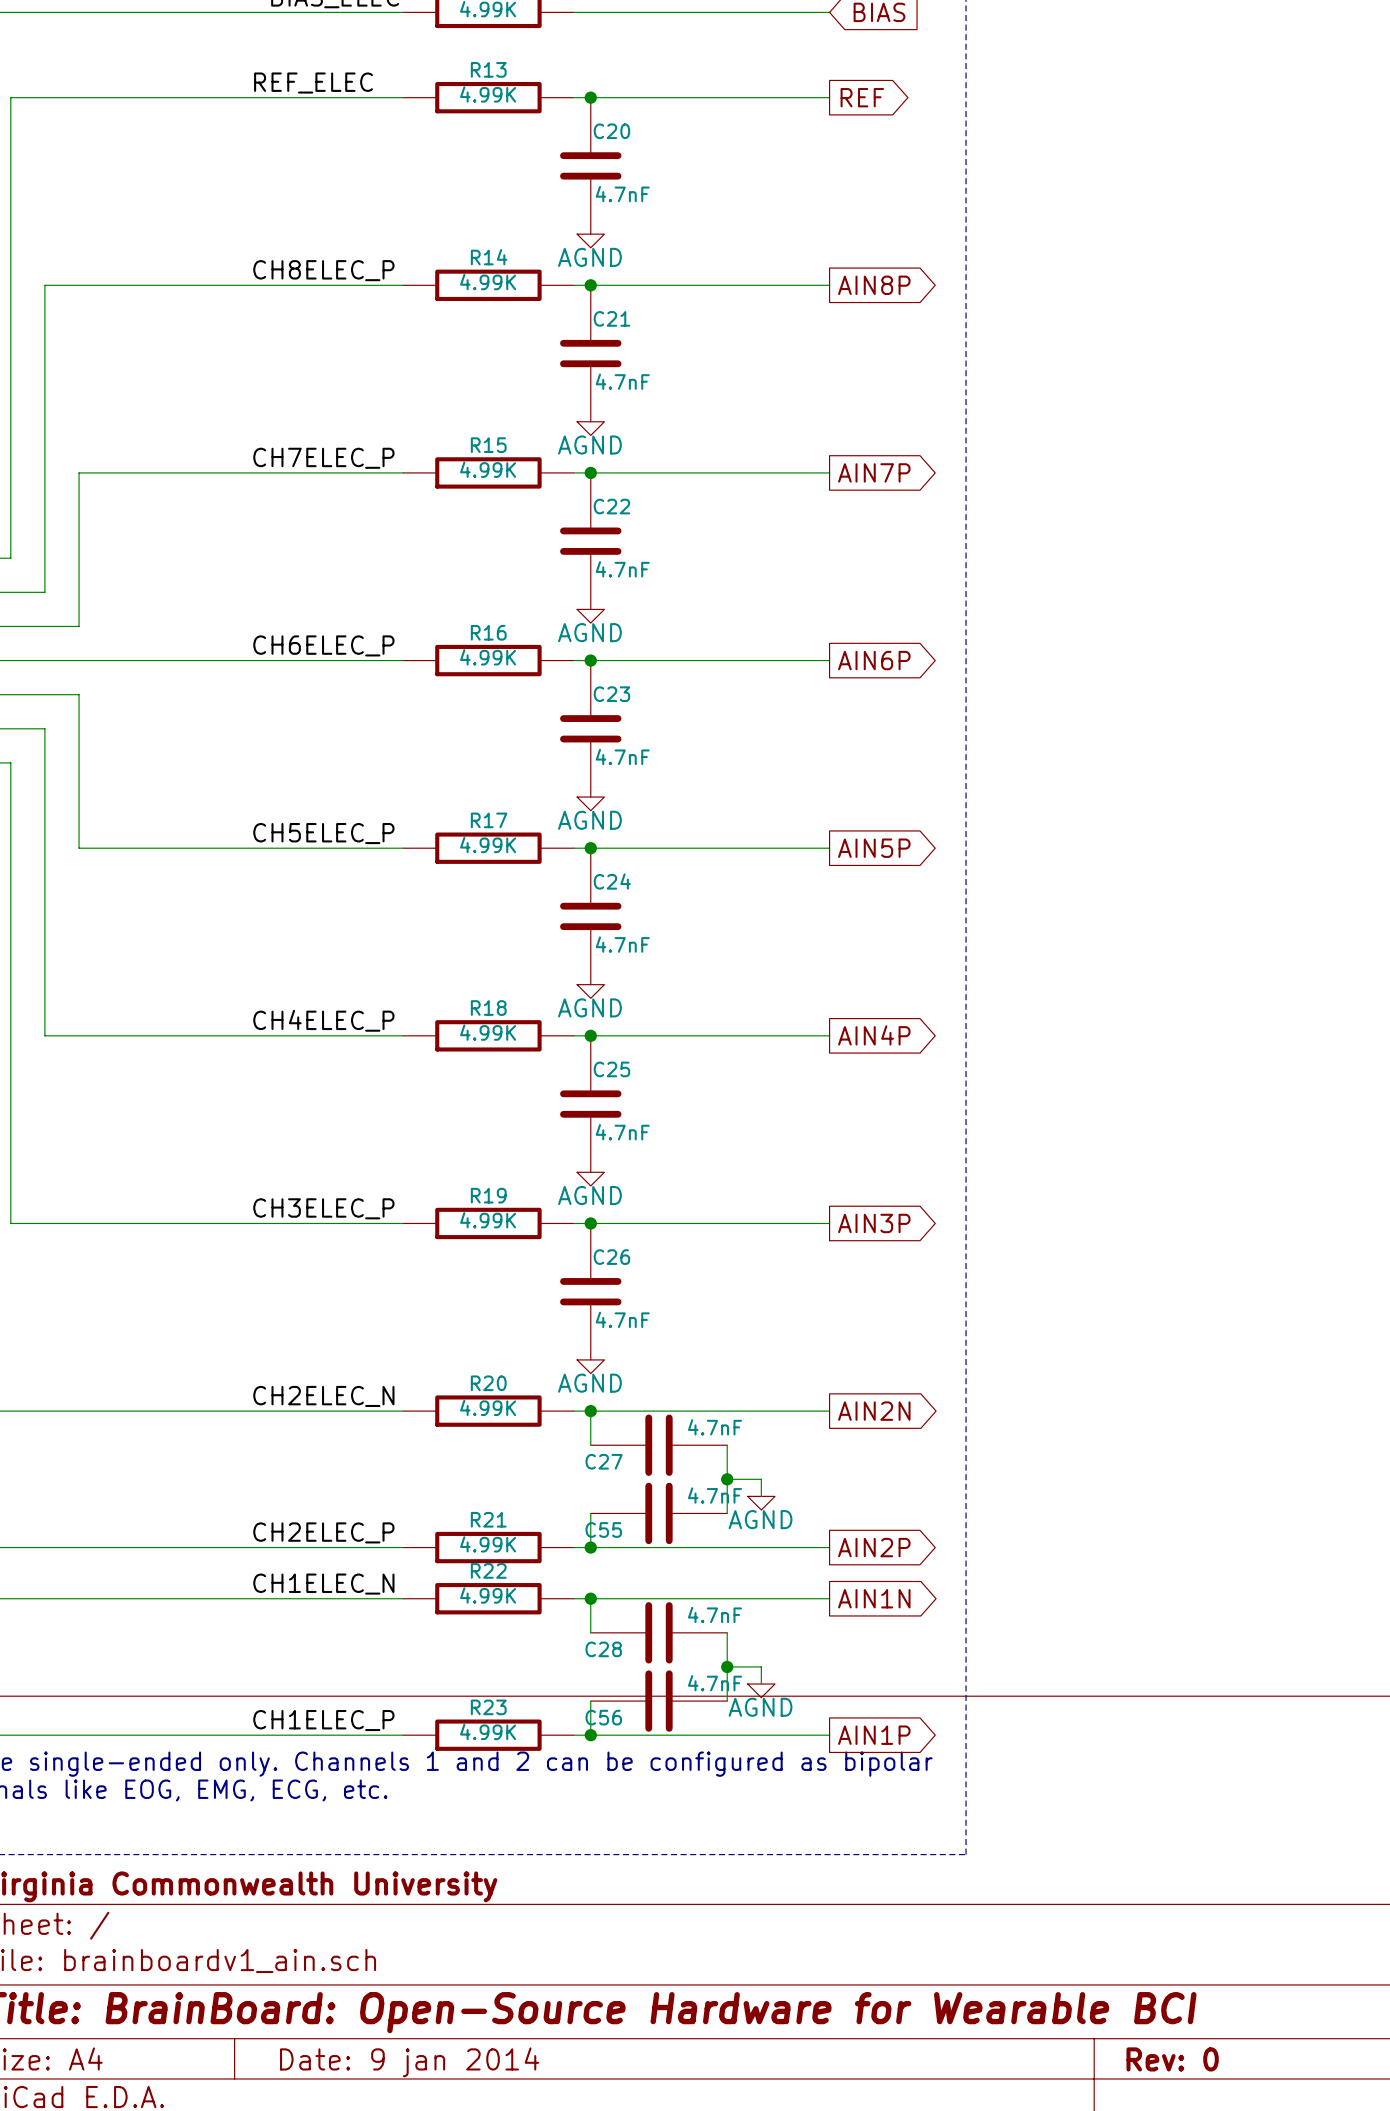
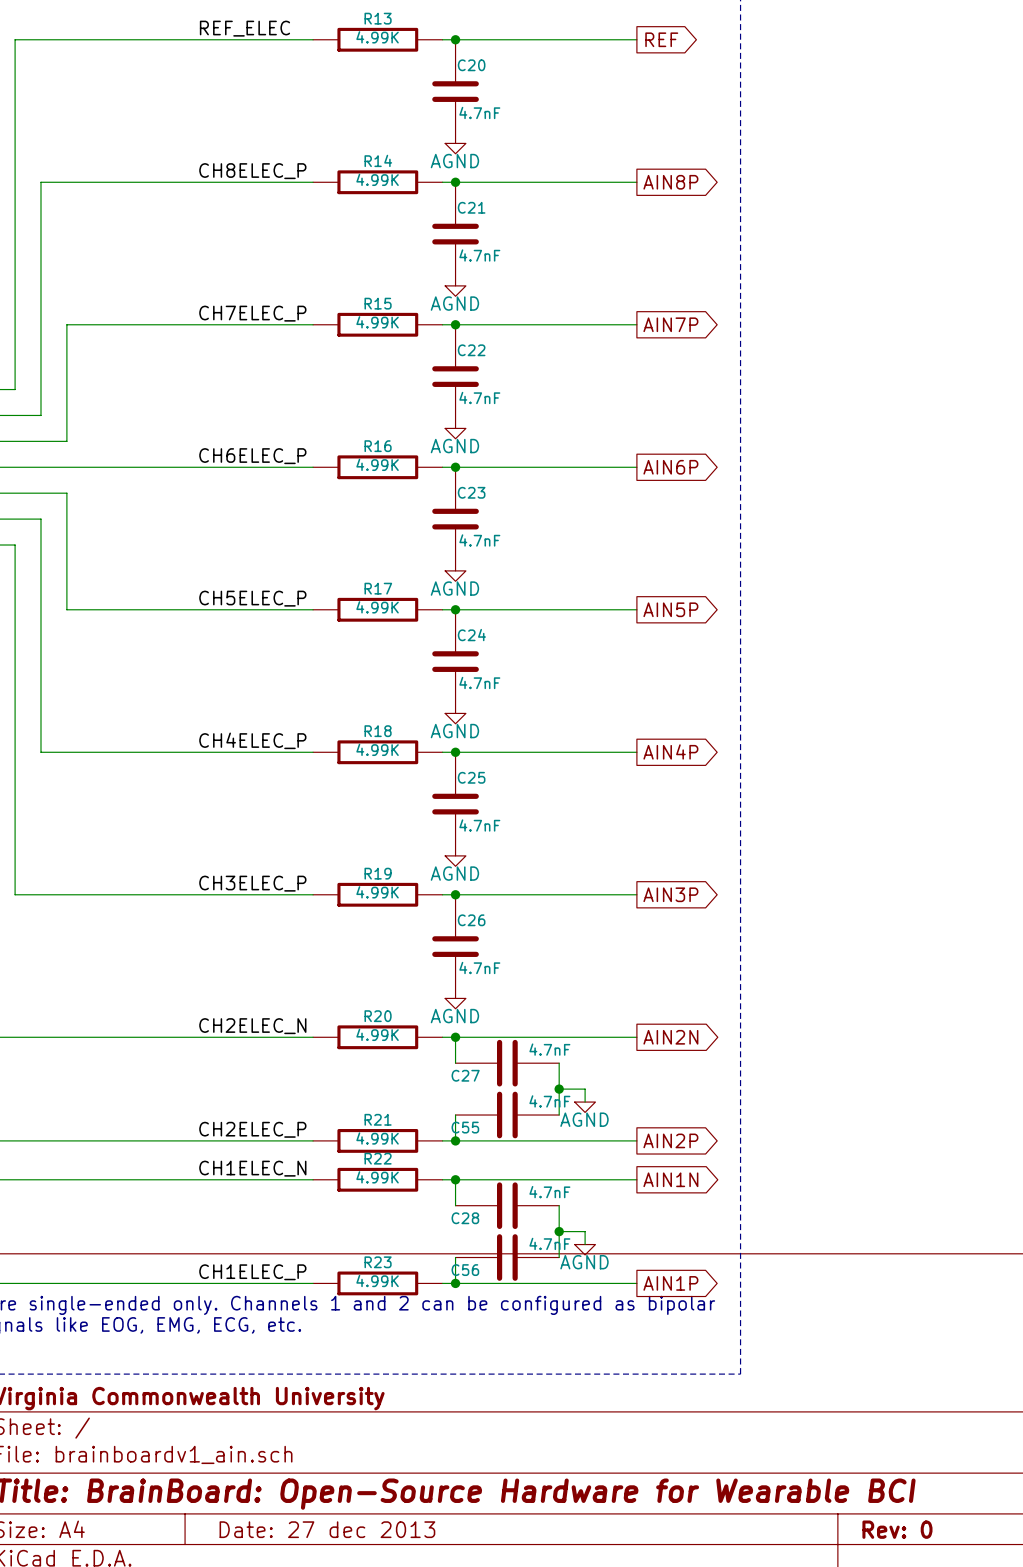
title block: Date: 9 jan 2014 (409, 2062) -> Date: 27 dec 2013 (327, 1529)

